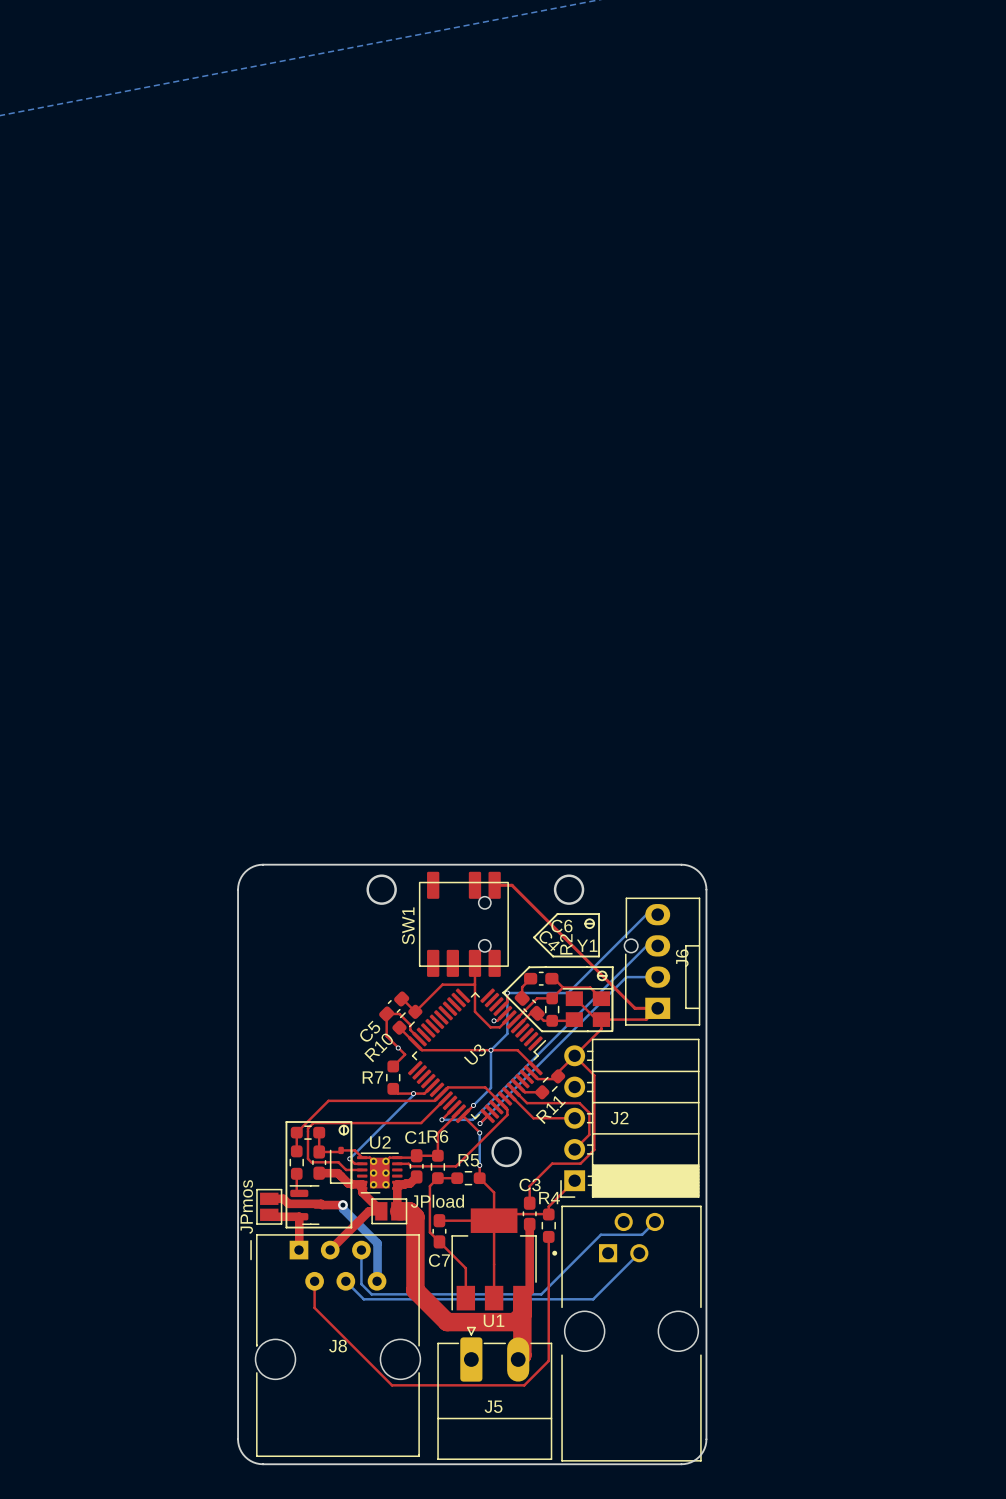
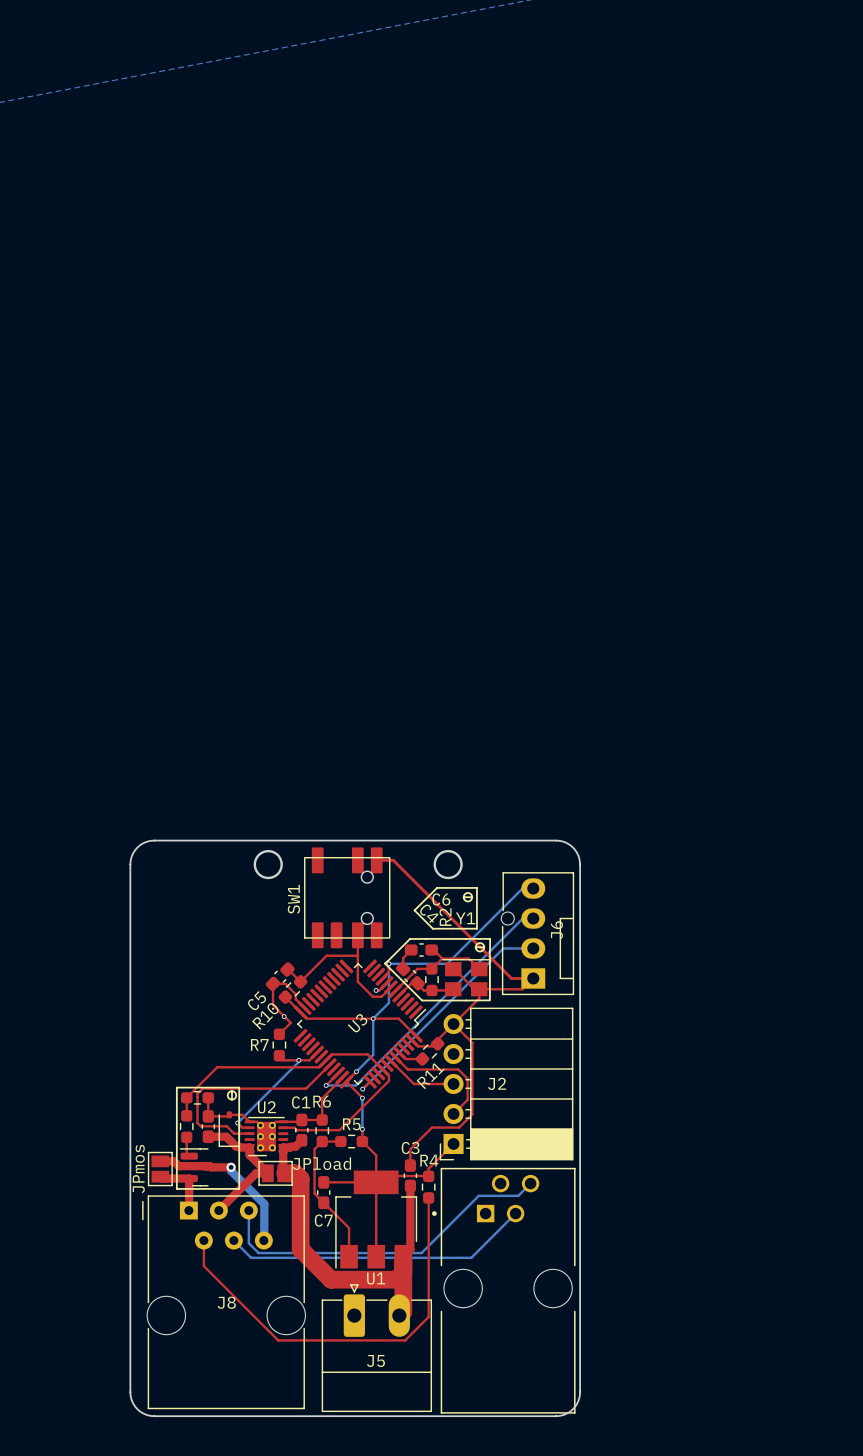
round board edge: [491, 1136, 522, 1168] -> none

